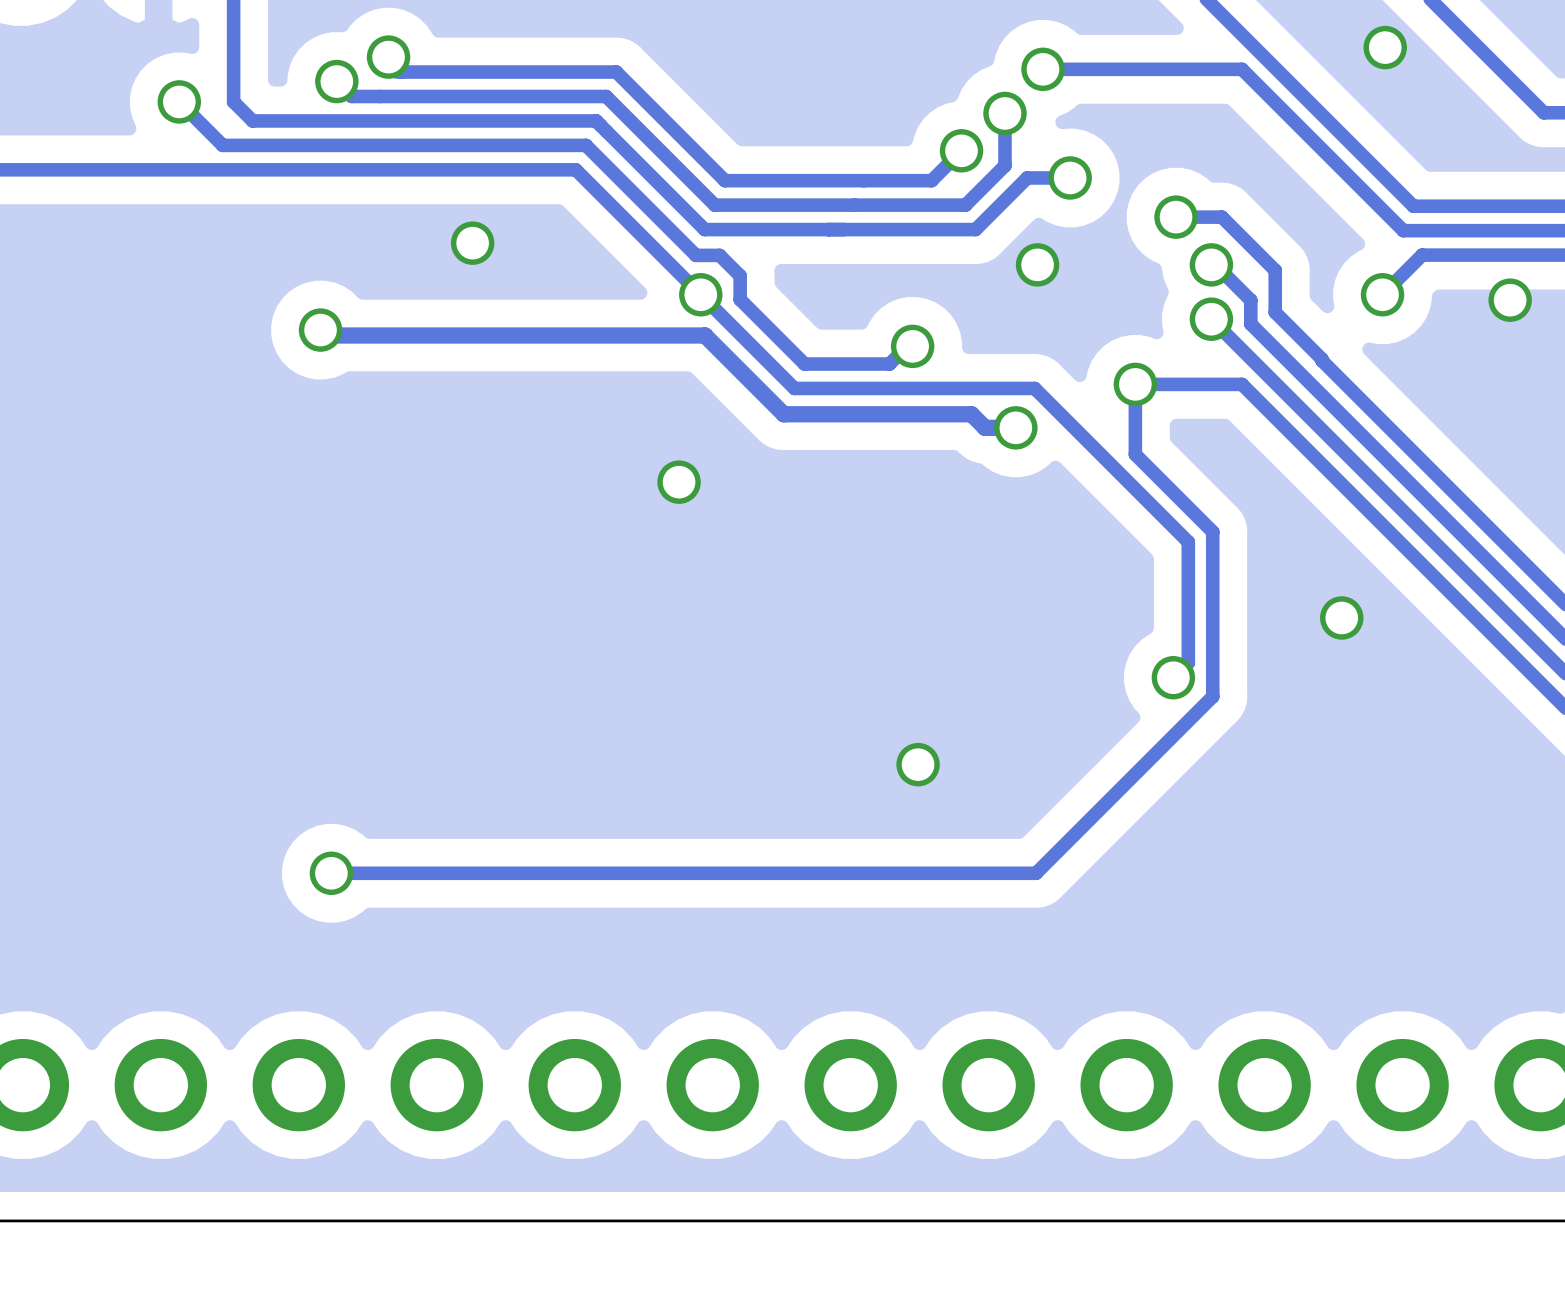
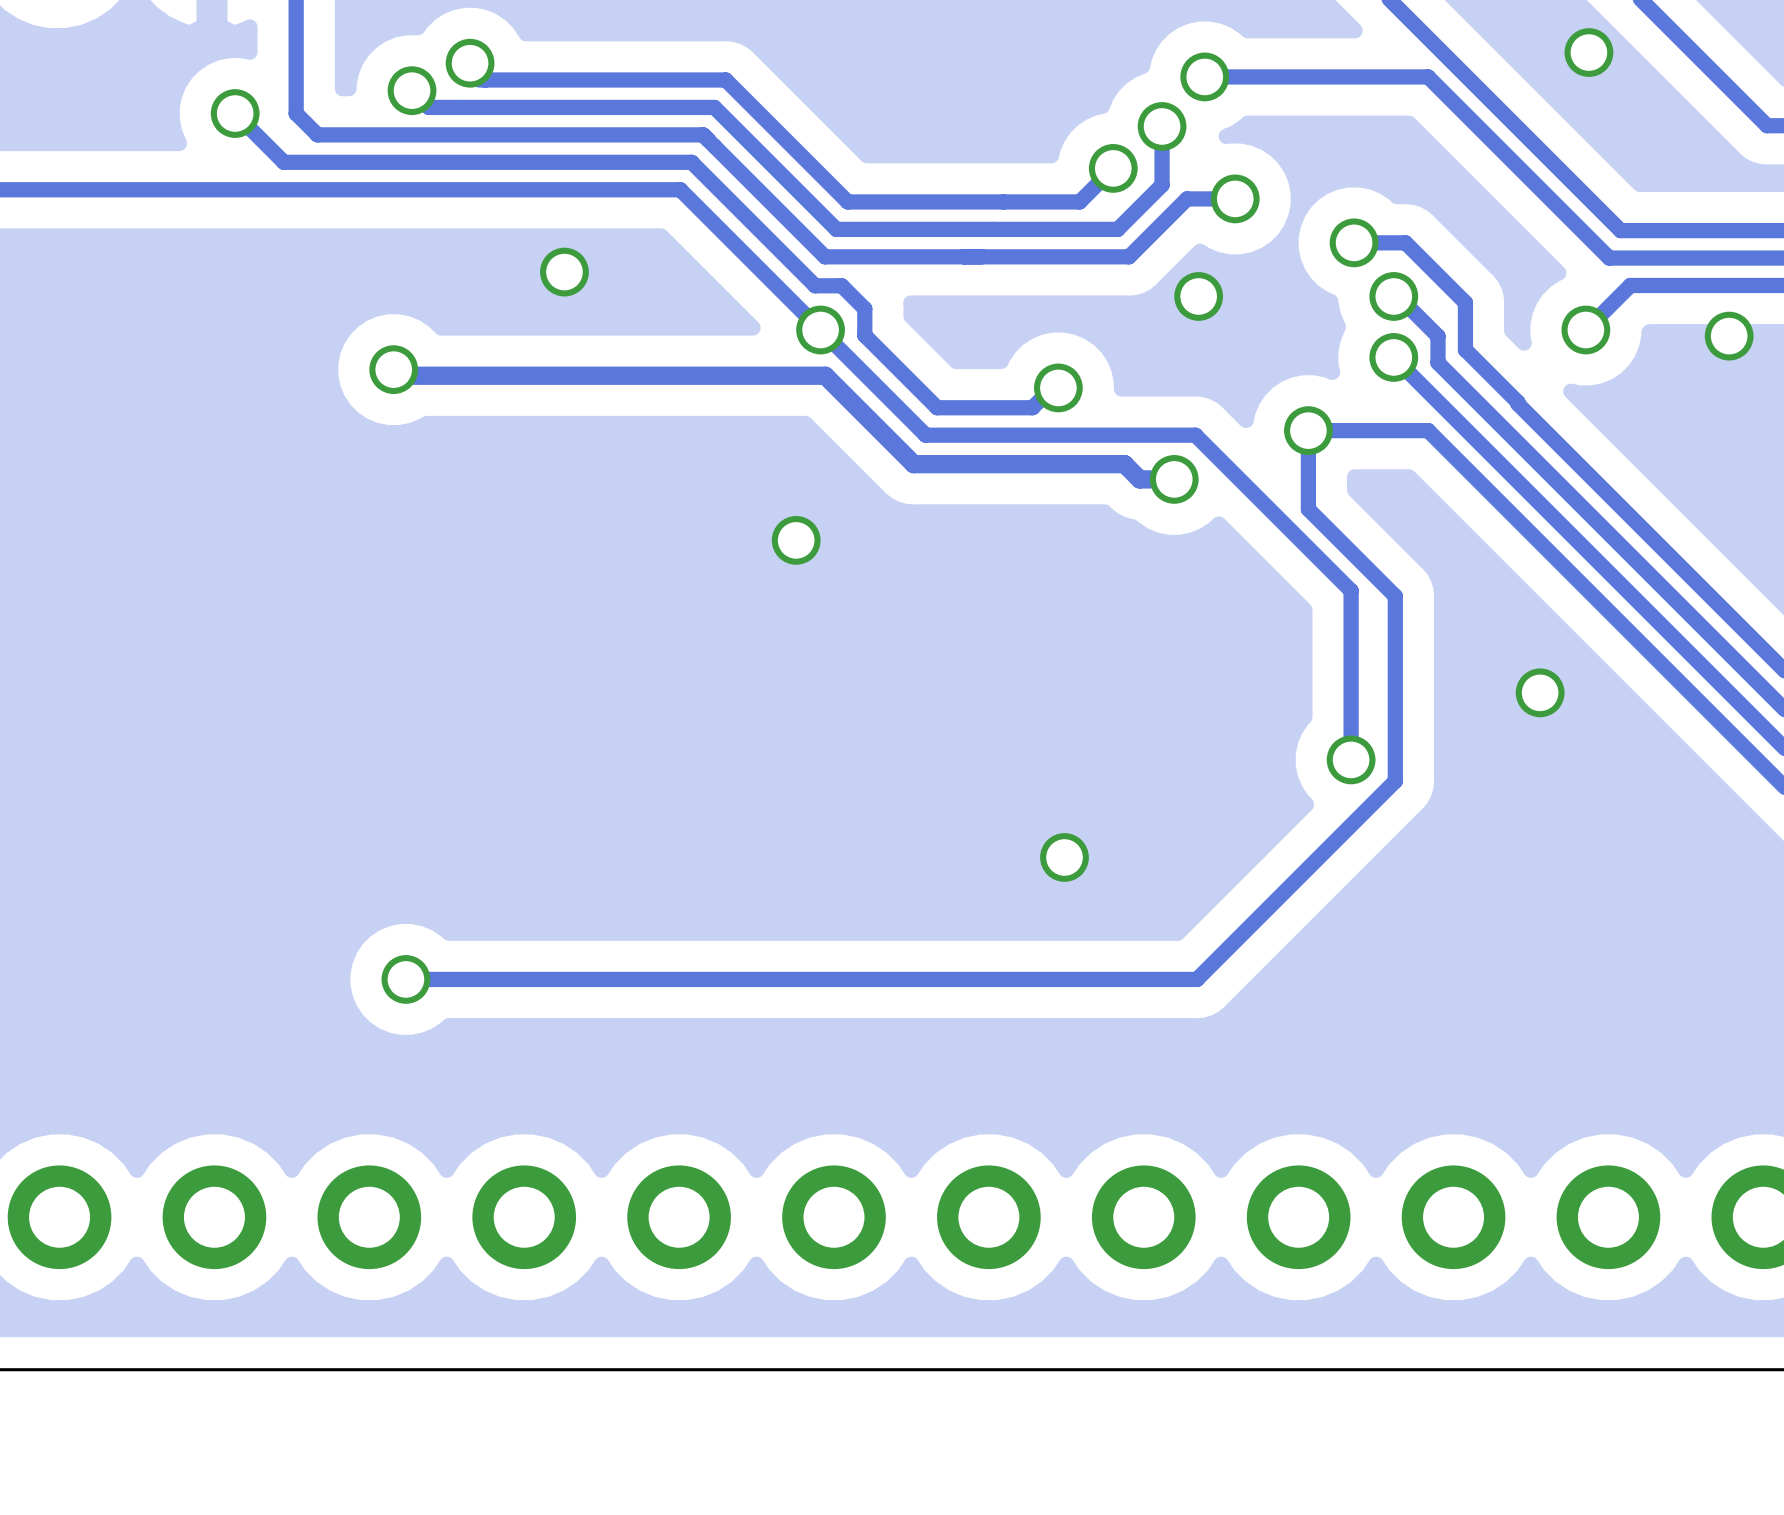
track: (1173, 527) (1188, 542) (1188, 662) (1173, 677) -> (1351, 590) (1351, 759)

